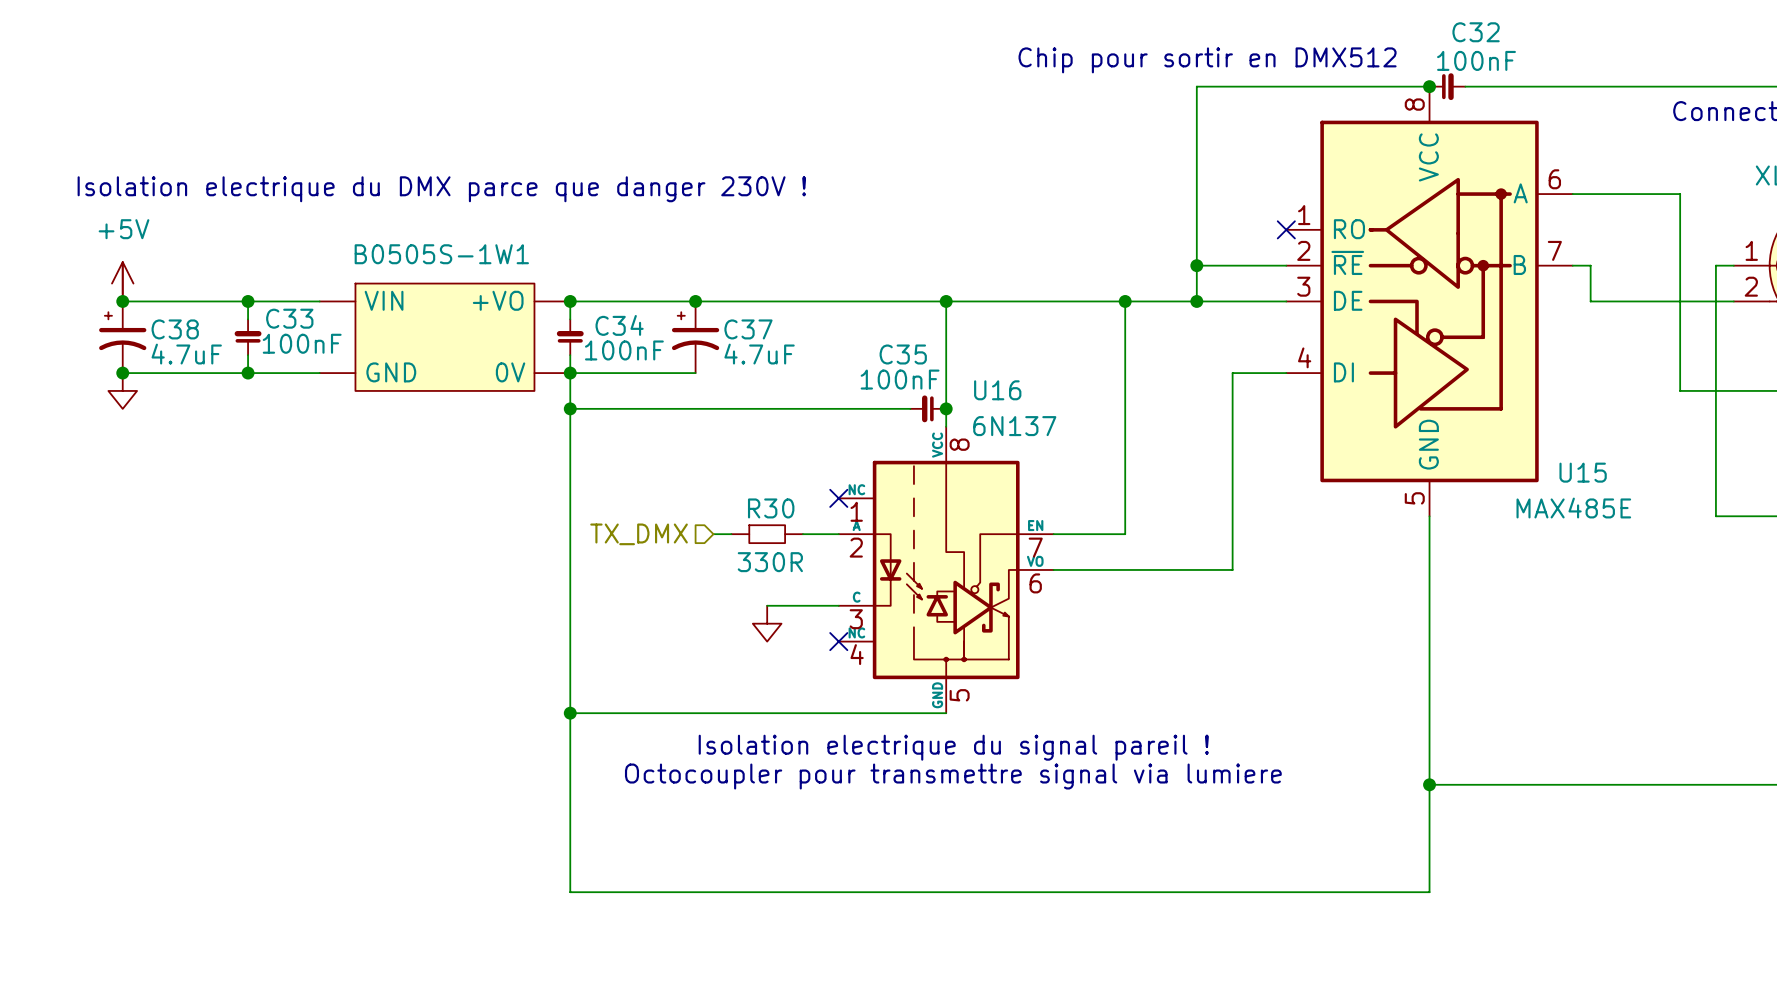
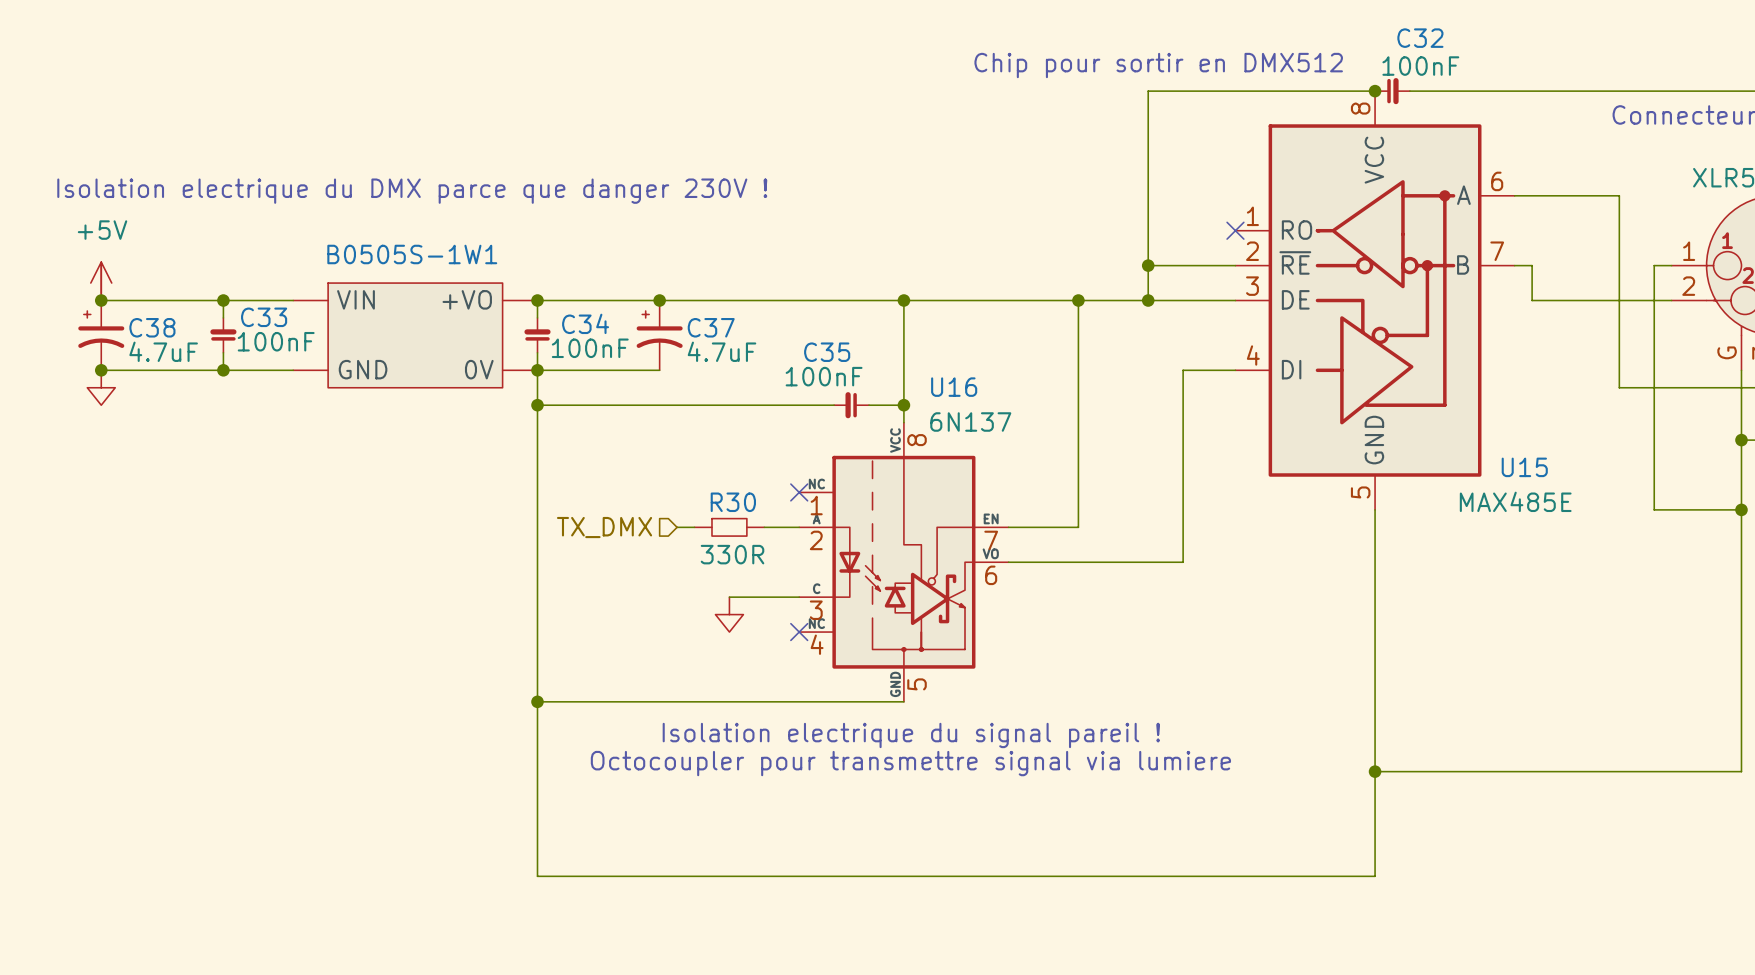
C35 position: (928, 408) -> (851, 405)

